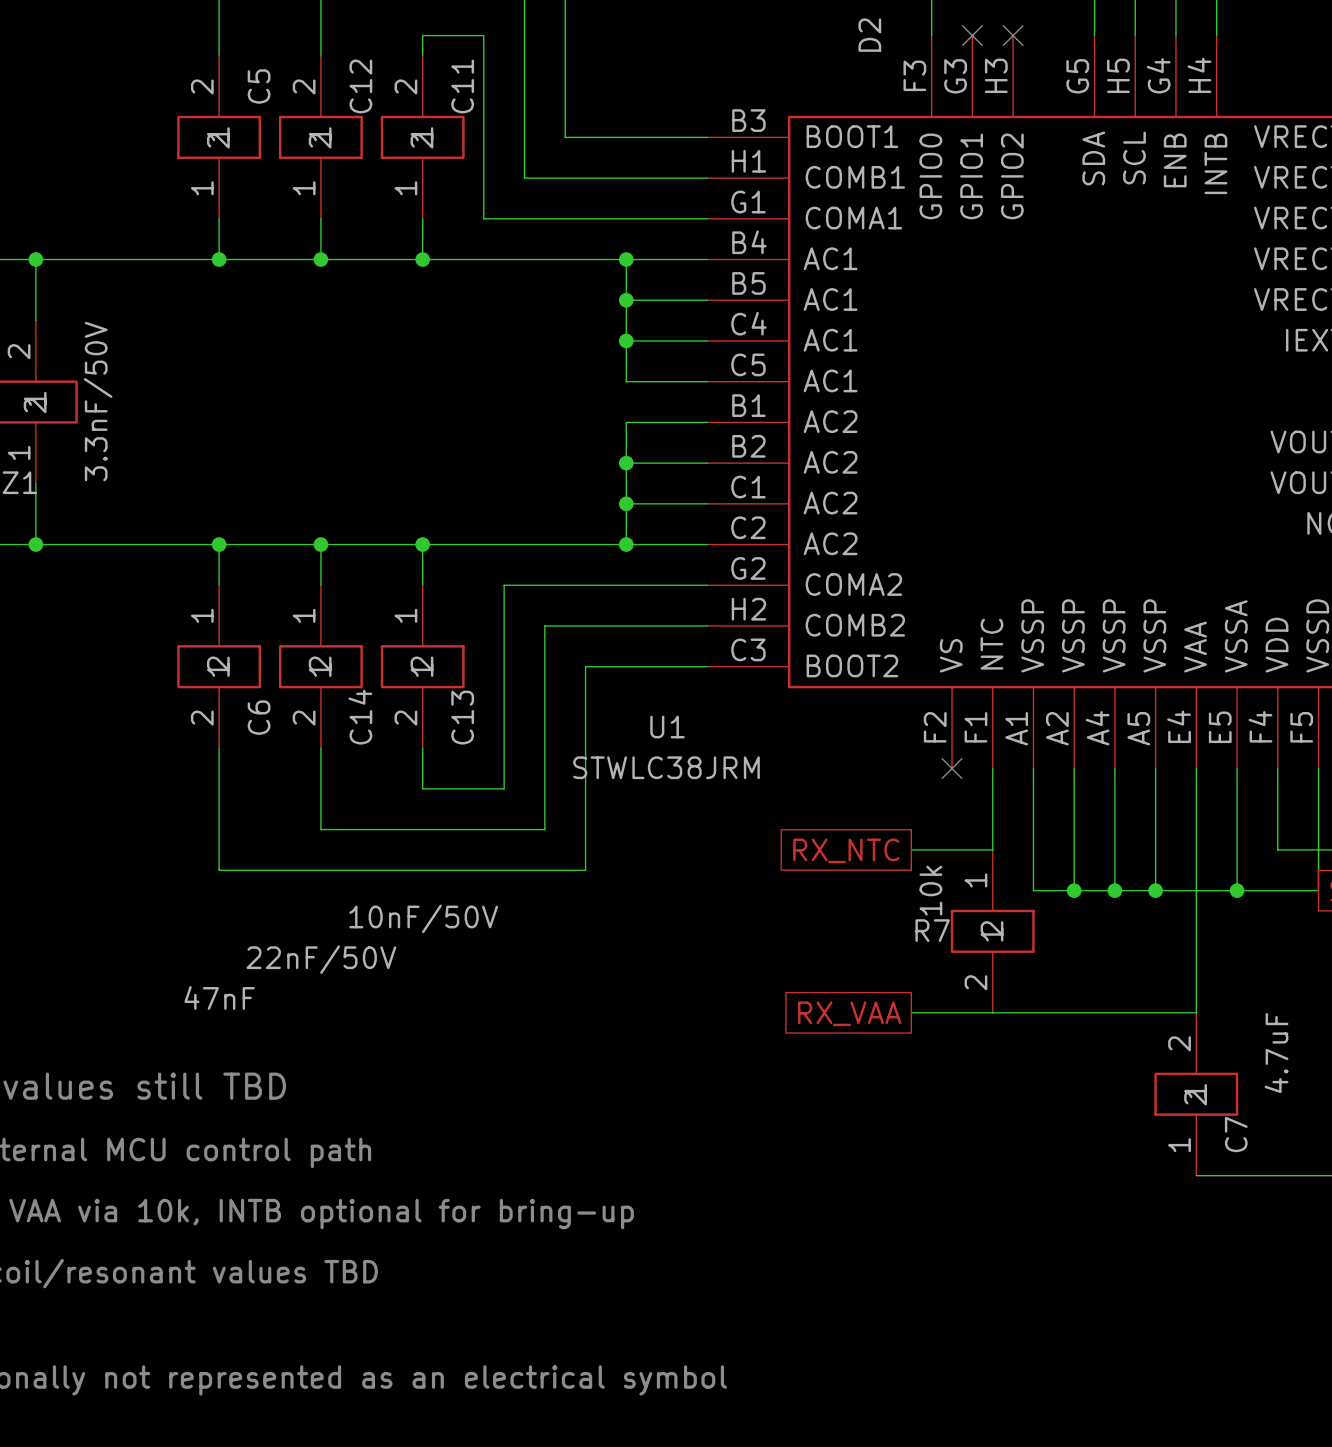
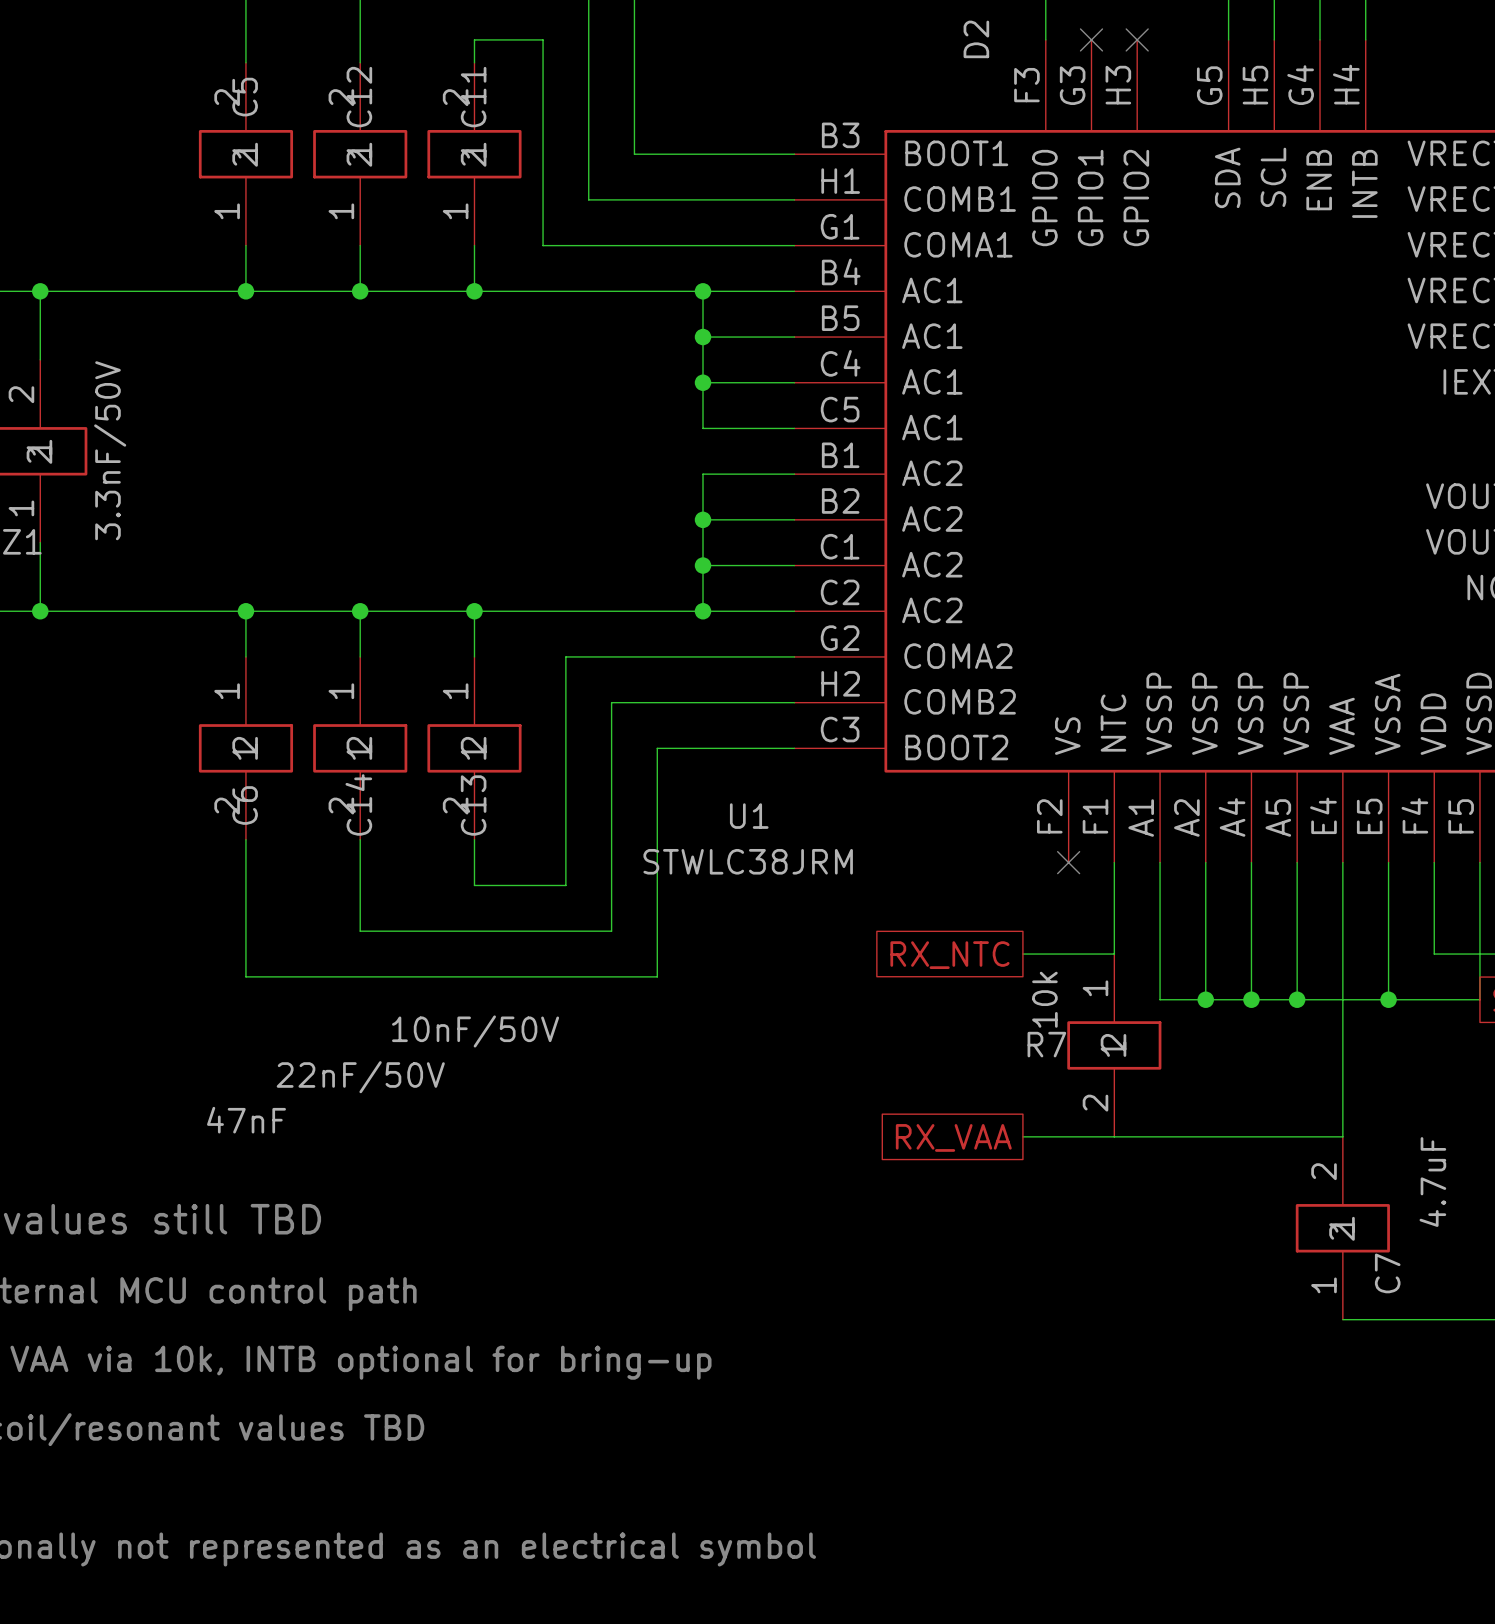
C5 name position: C5 (259, 86) -> C5 (245, 97)
C12 name position: C12 (360, 86) -> C12 (359, 97)
C11 name position: C11 (462, 86) -> C11 (473, 97)
C6 name position: C6 (259, 717) -> C6 (245, 805)
C14 name position: C14 (360, 717) -> C14 (358, 804)
C13 name position: C13 (462, 717) -> C13 (473, 805)

